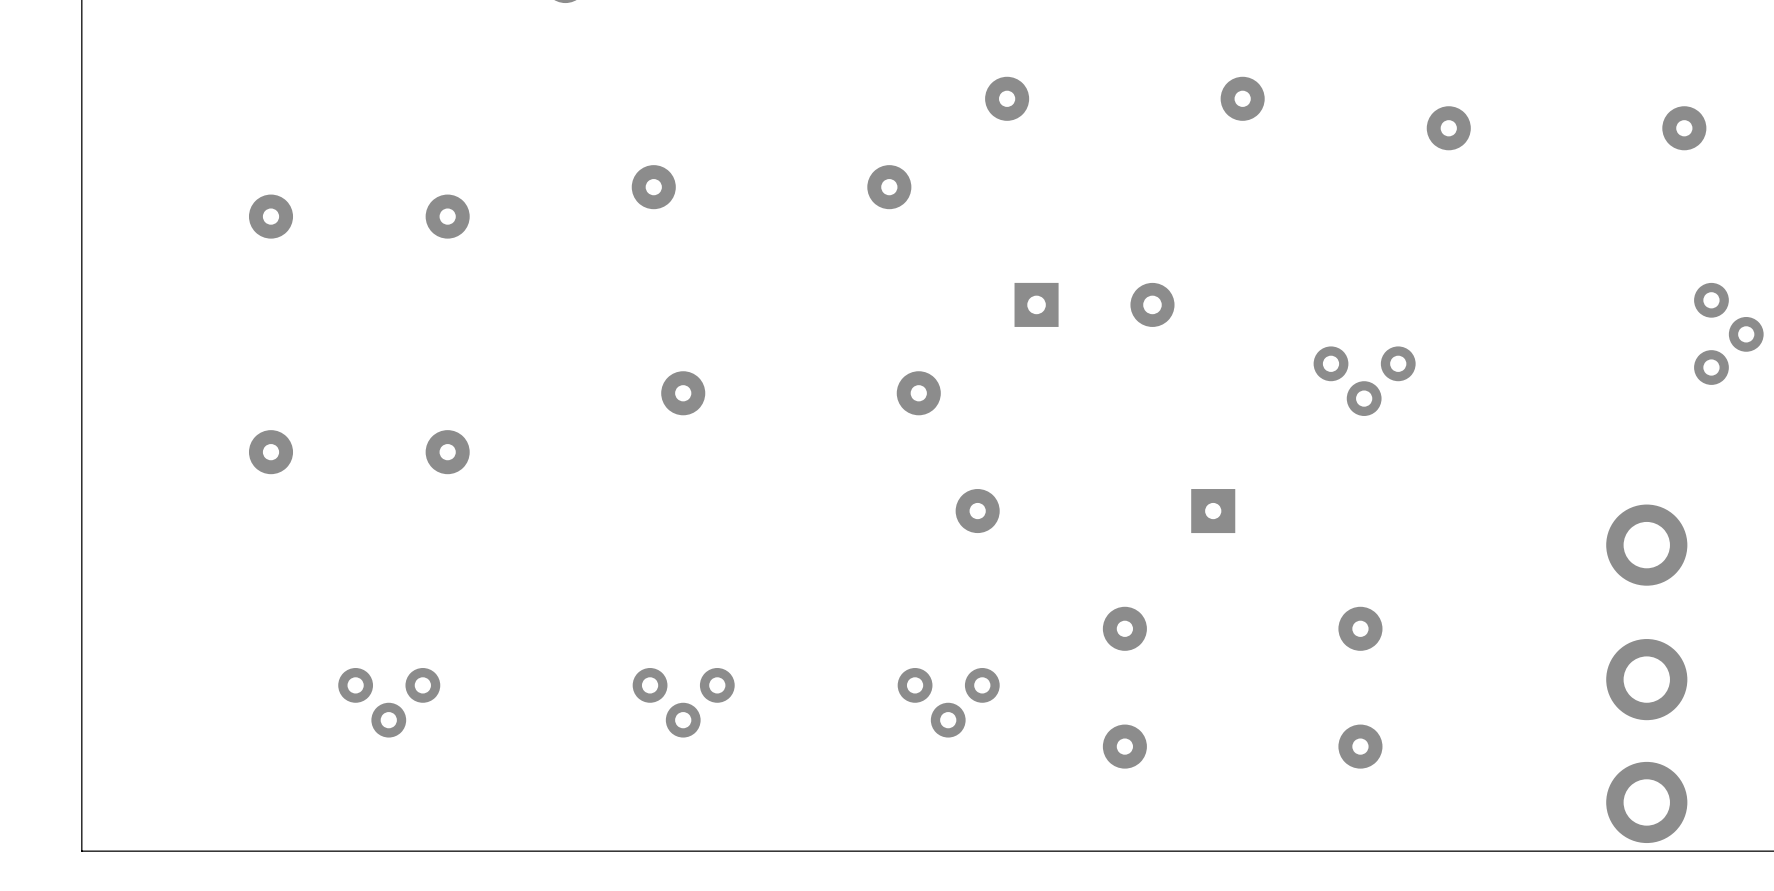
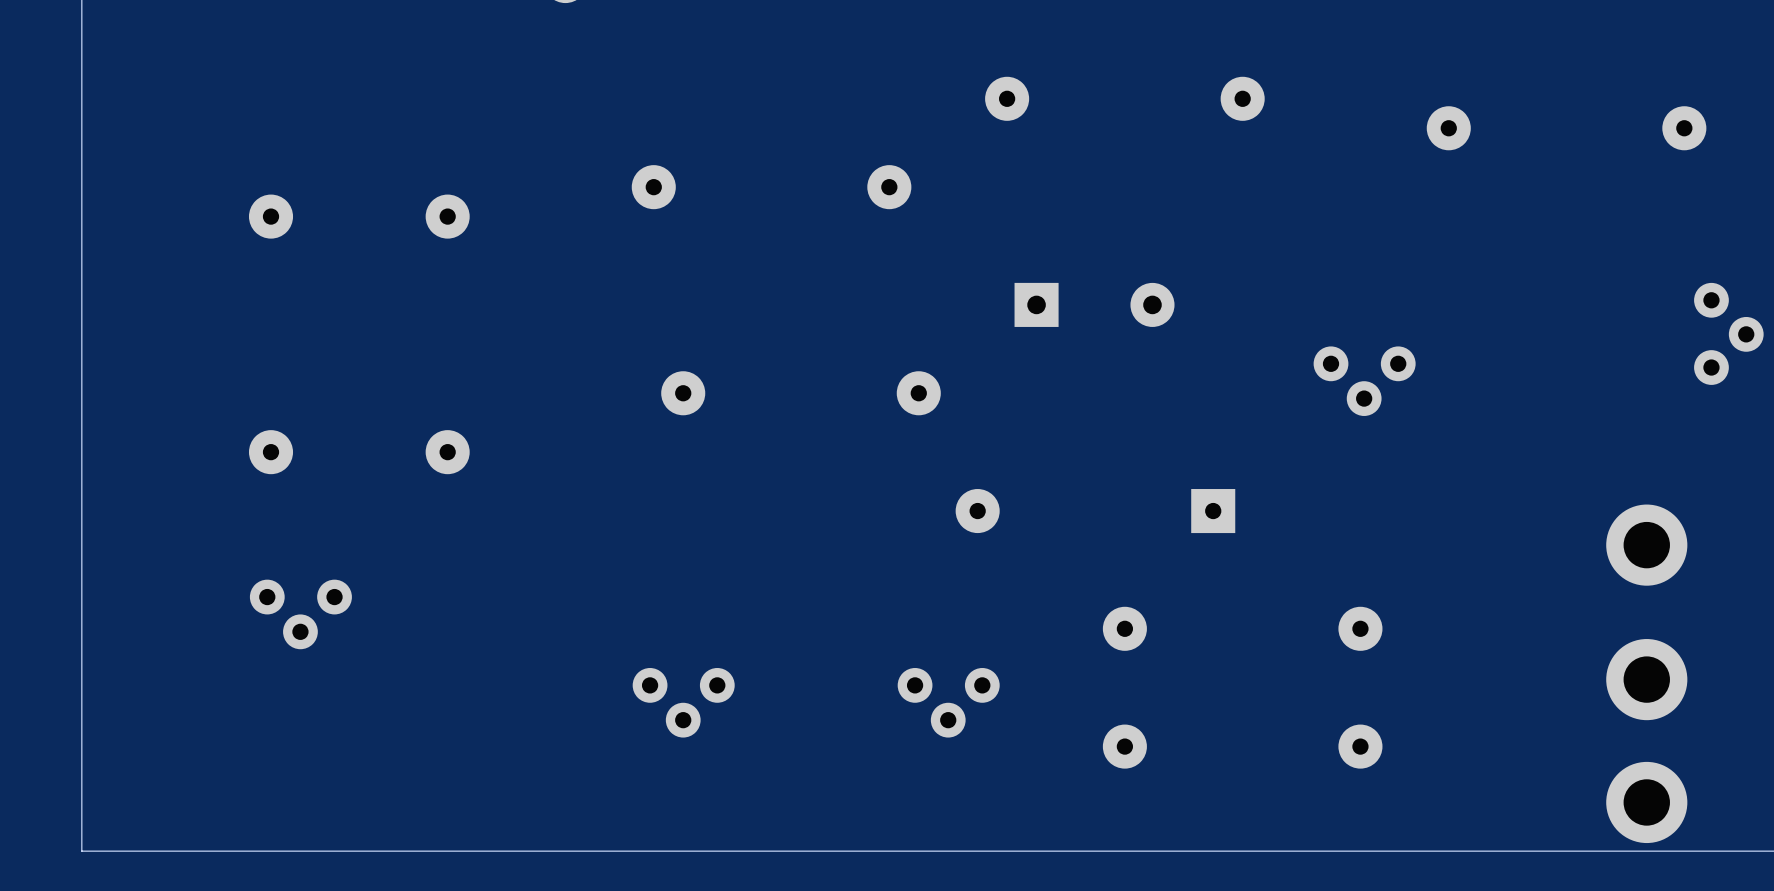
part position: (389, 702) -> (300, 614)

